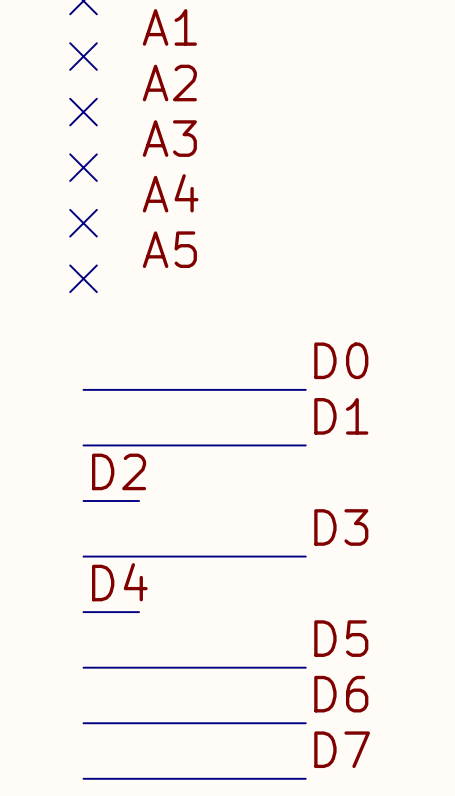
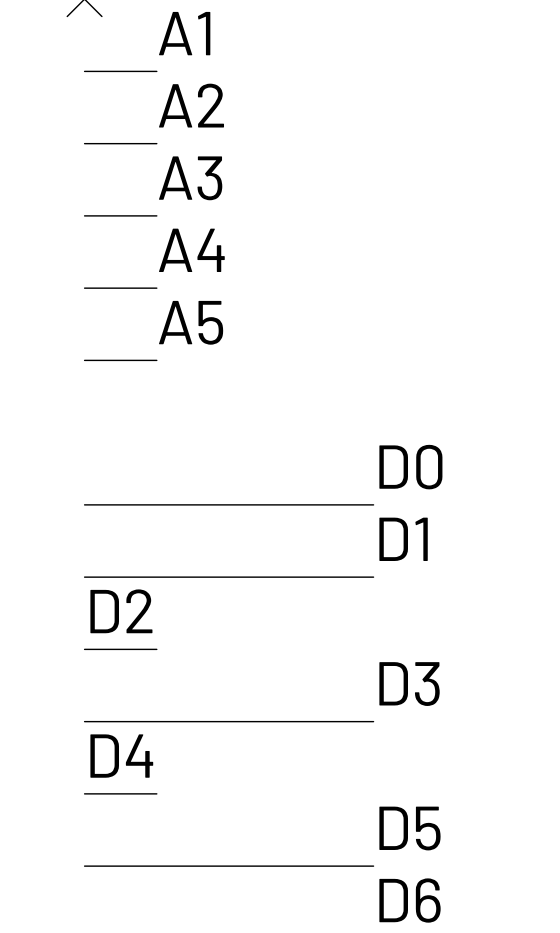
wire: none -> (84, 71) (156, 71)
no-connect mark: (83, 56) -> none
wire: none -> (84, 143) (156, 143)
no-connect mark: (83, 112) -> none
wire: none -> (84, 215) (156, 215)
no-connect mark: (83, 167) -> none
wire: none -> (84, 288) (156, 288)
no-connect mark: (83, 223) -> none
wire: none -> (84, 360) (156, 360)
no-connect mark: (83, 278) -> none

